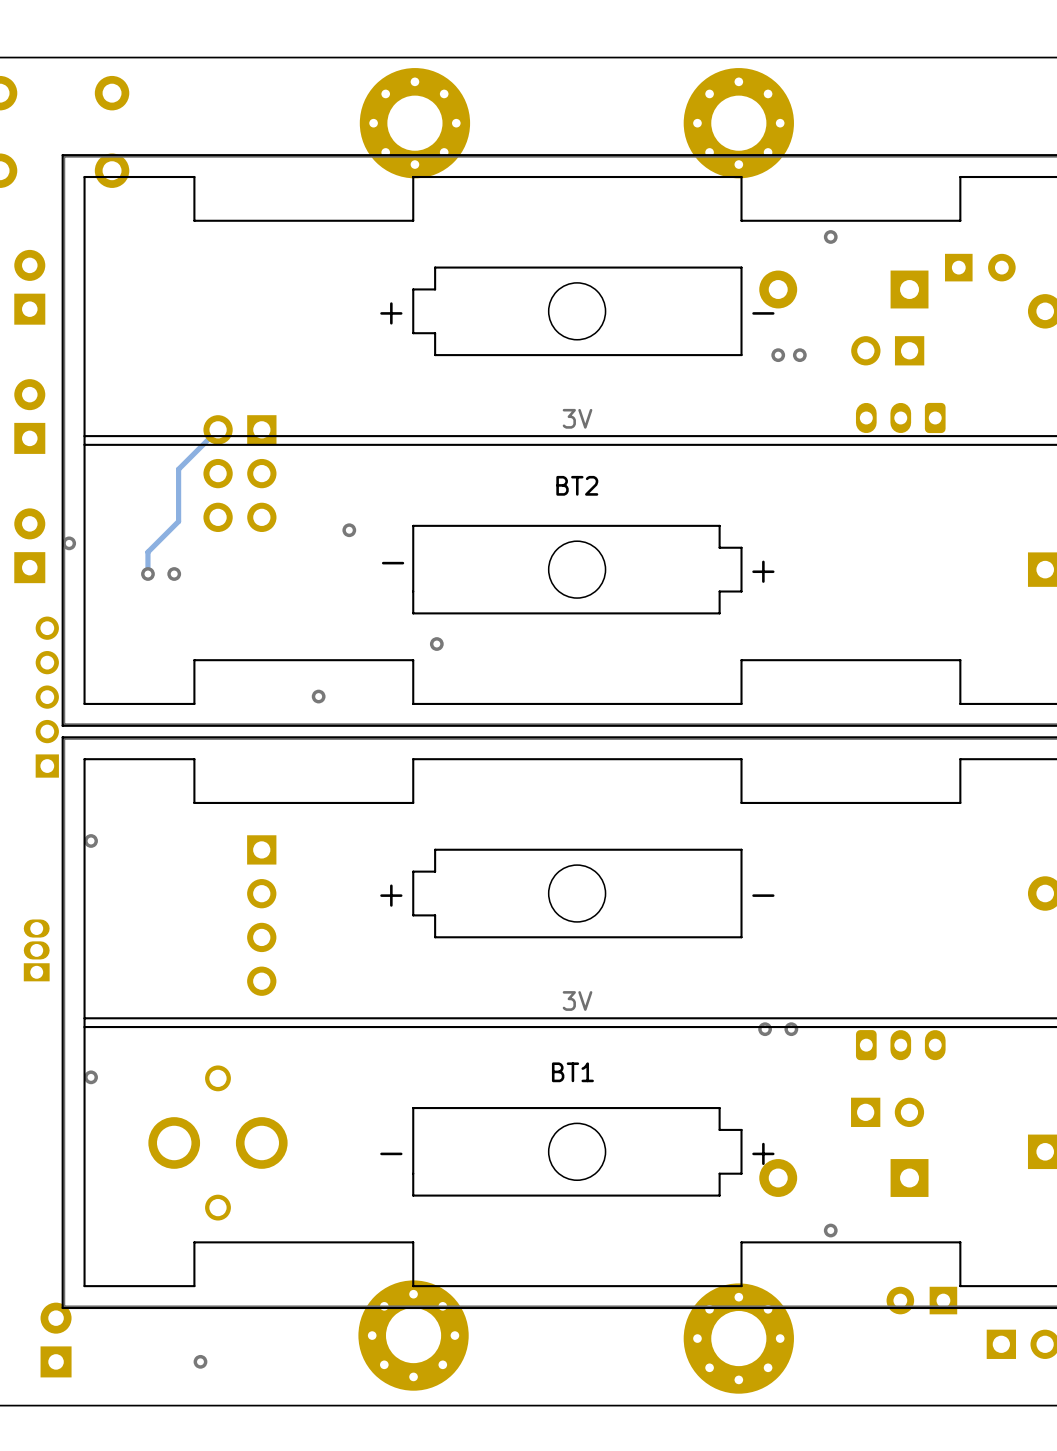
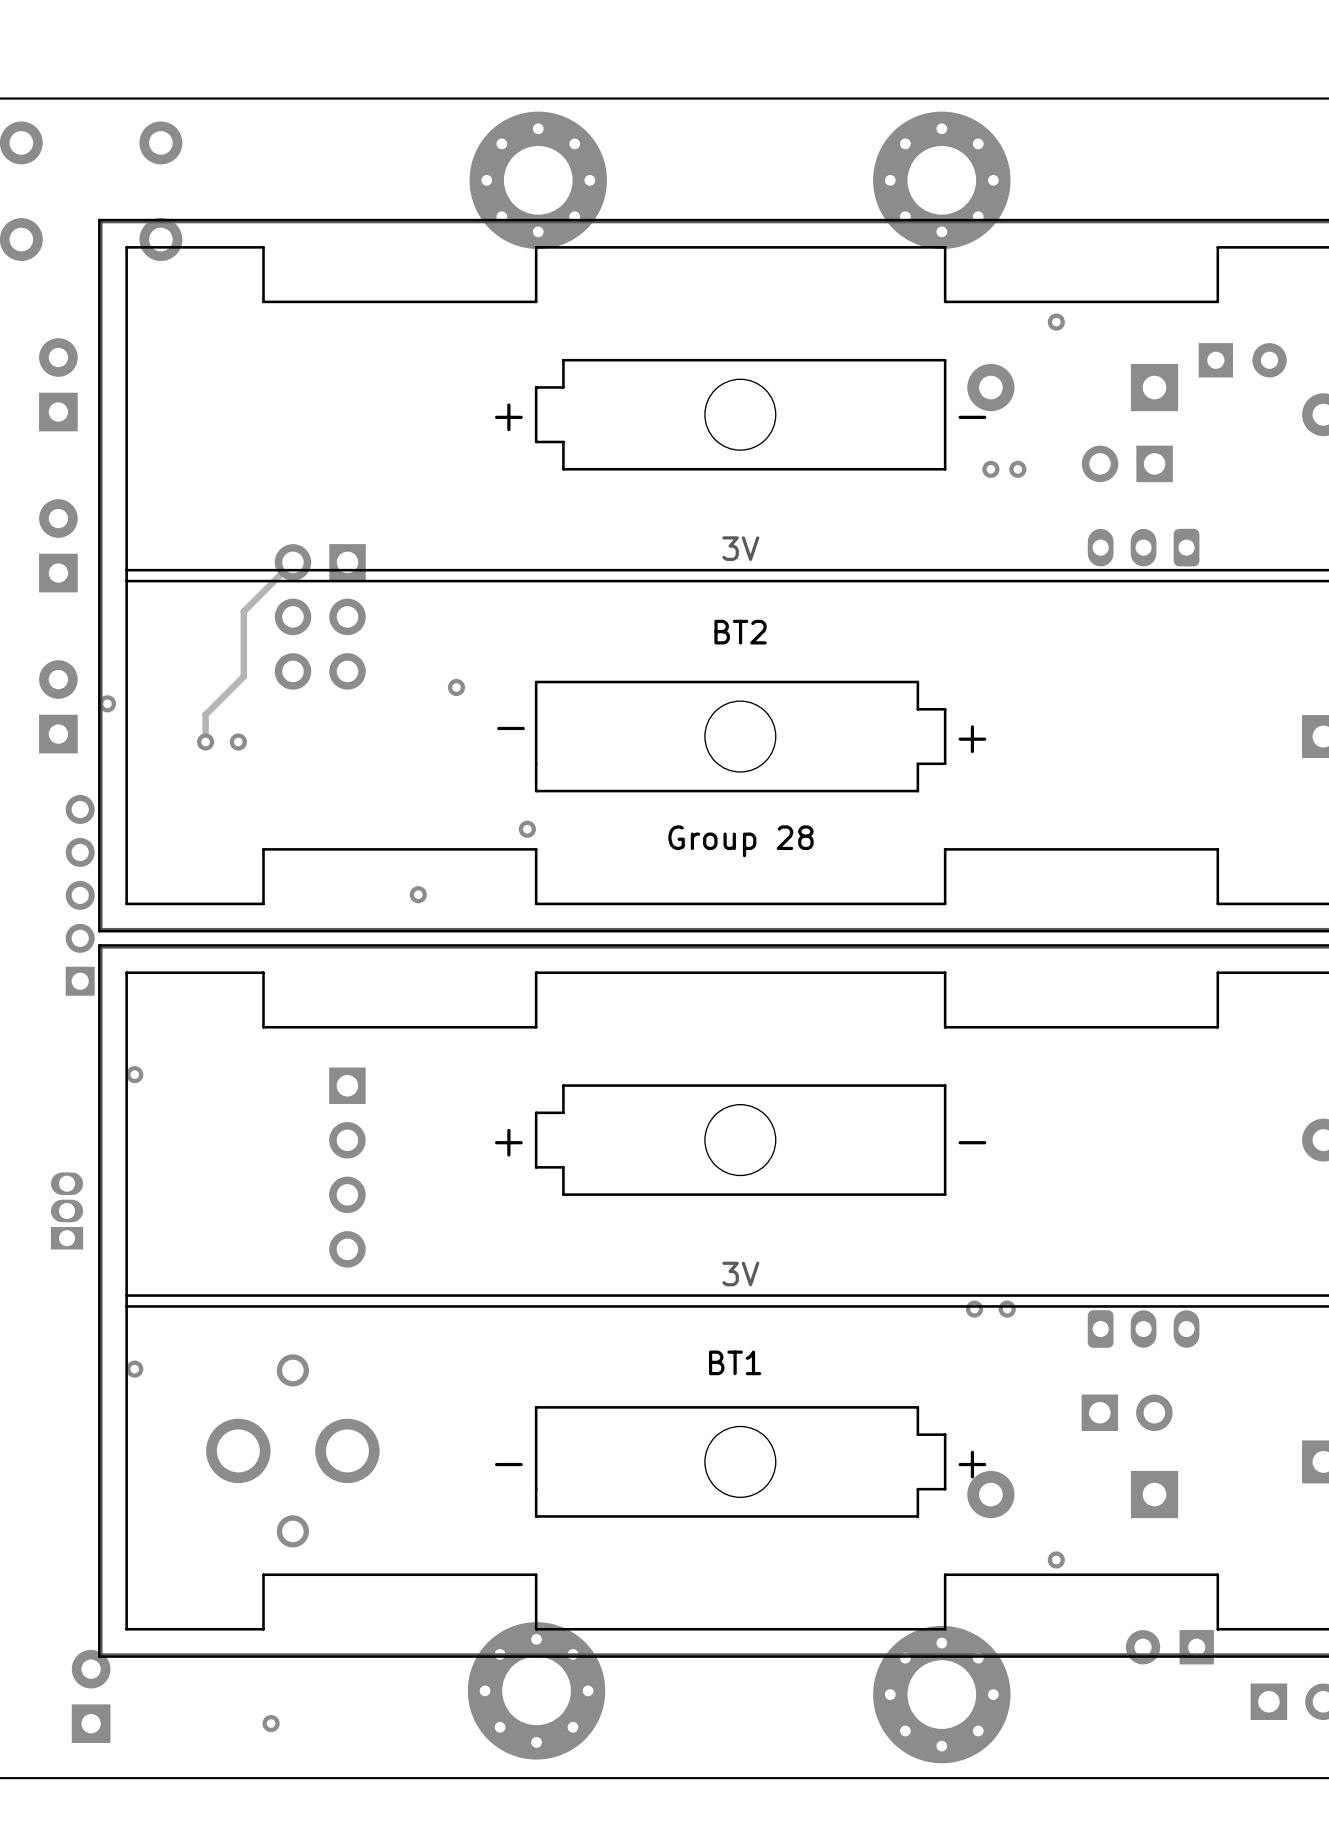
via position: (436, 644) -> (527, 829)
text: none -> Group 28 (740, 841)

